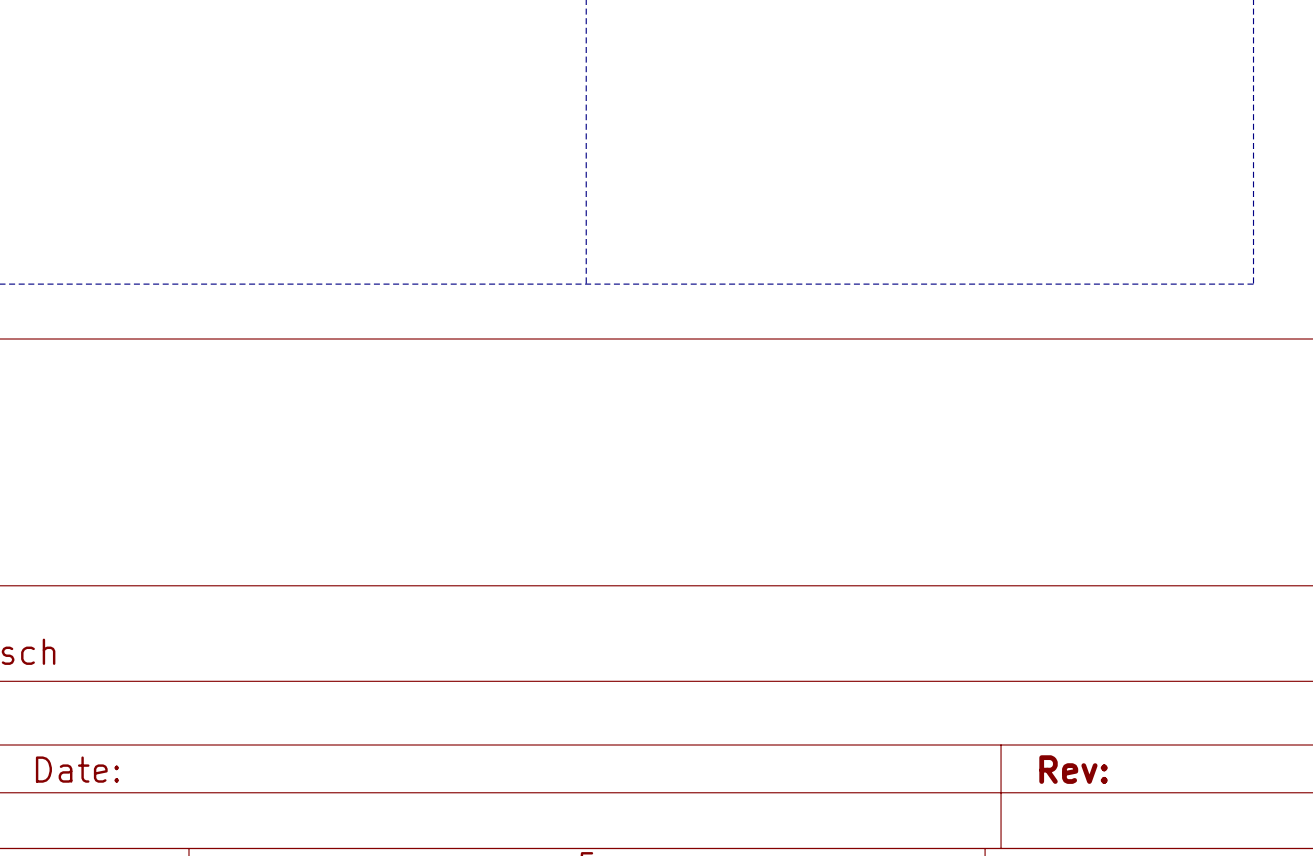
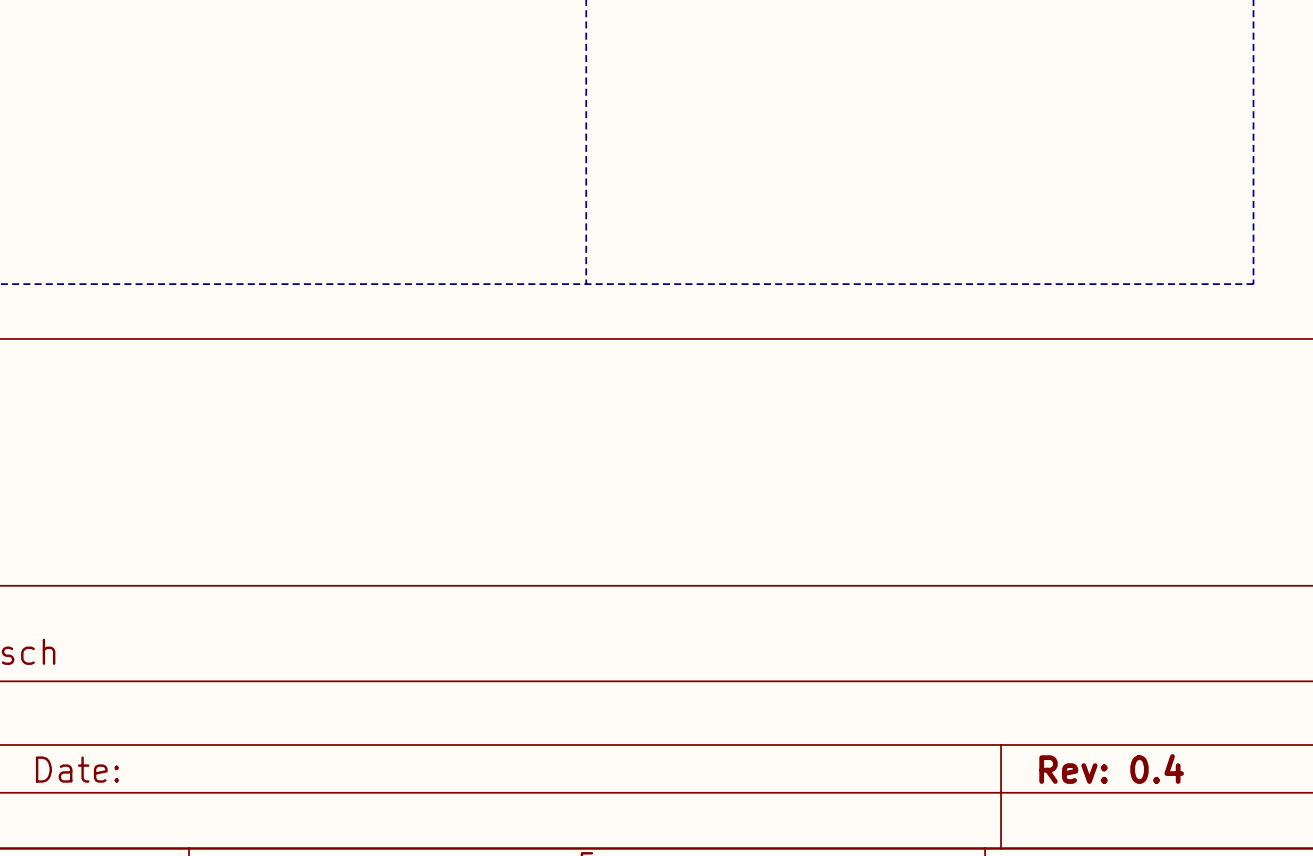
title block: Rev: (1073, 769) -> Rev: 0.4 (1111, 769)

